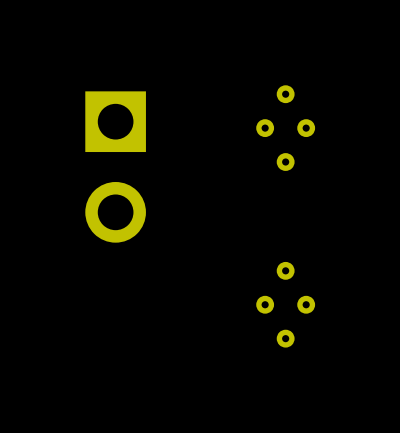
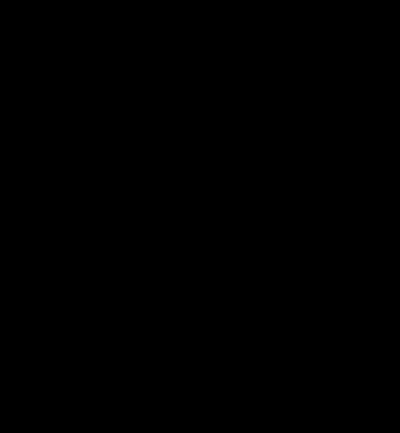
part: (285, 128) -> none
part: (115, 167) -> none
part: (285, 304) -> none

